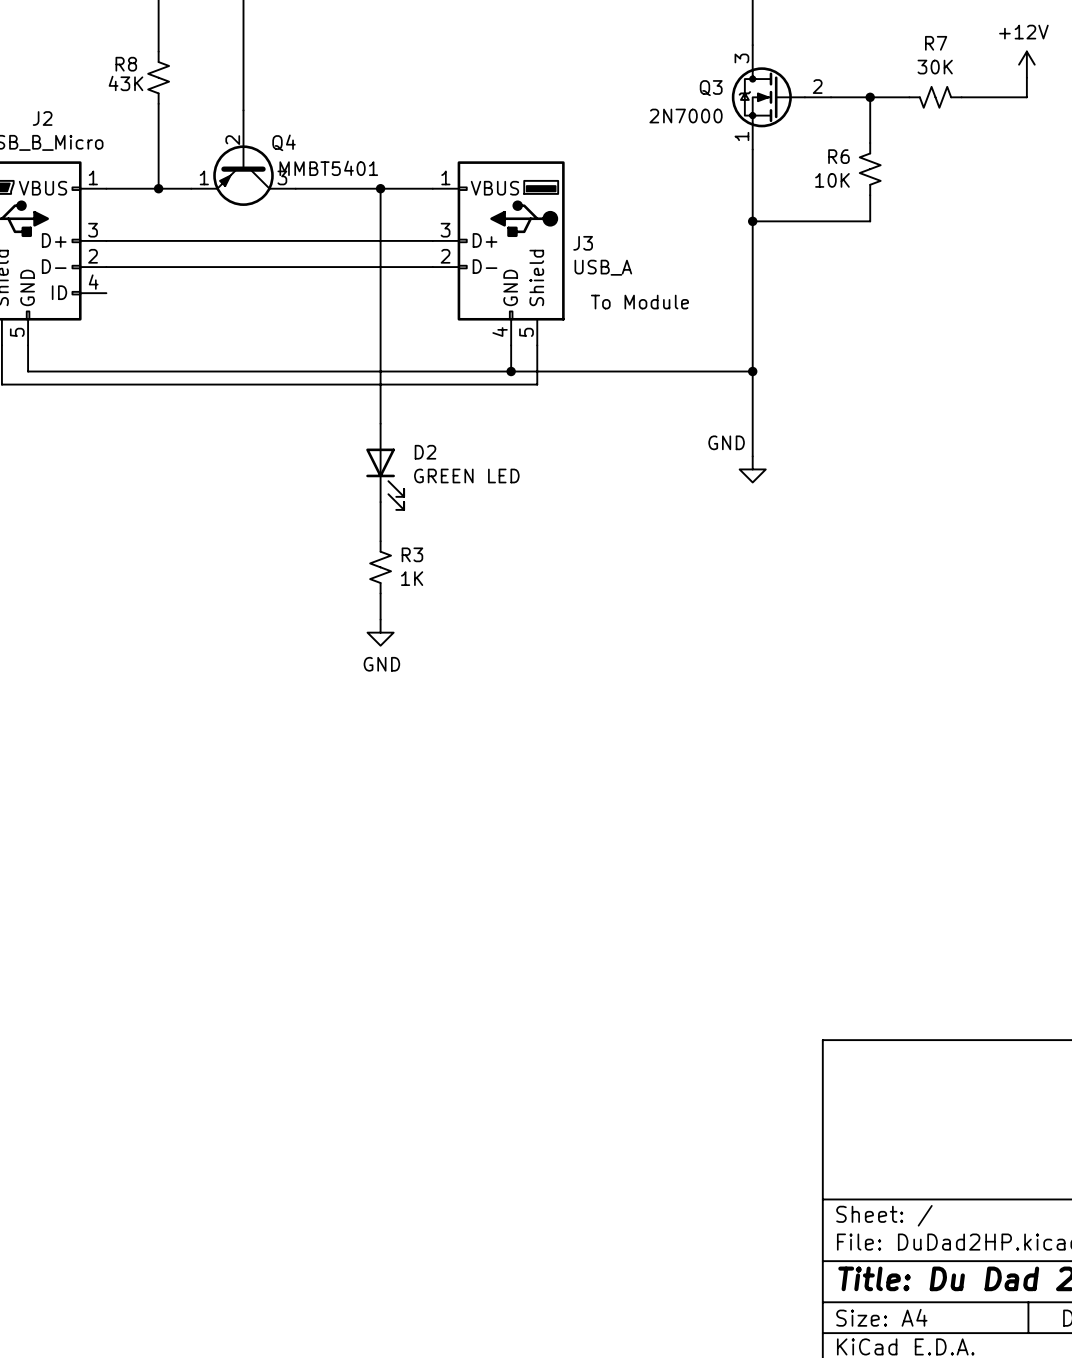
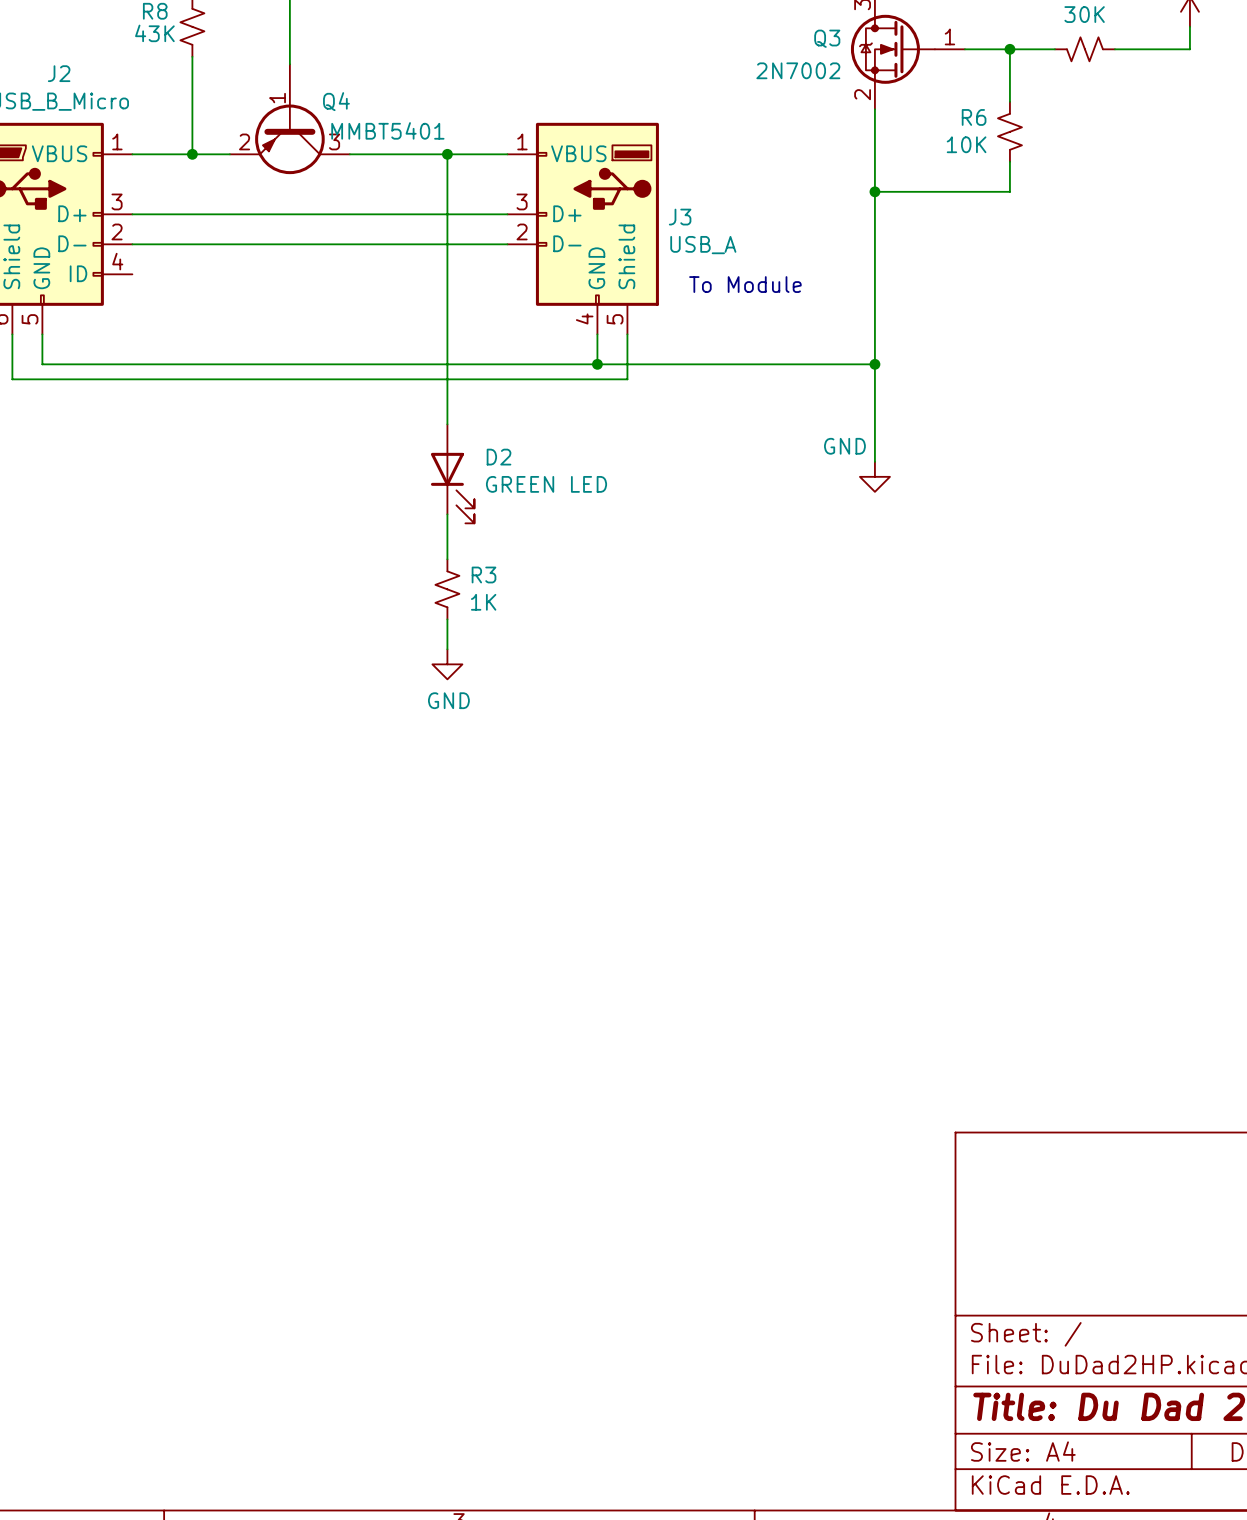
Q3 pin number: 2 (817, 86) -> 1 (949, 36)
Q3 value: 2N7000 (686, 116) -> 2N7002 (798, 70)
Q3 pin number: 1 (741, 136) -> 2 (862, 94)
Q4 pin number: 2 (232, 140) -> 1 (277, 98)
Q4 pin number: 1 (204, 177) -> 2 (244, 141)

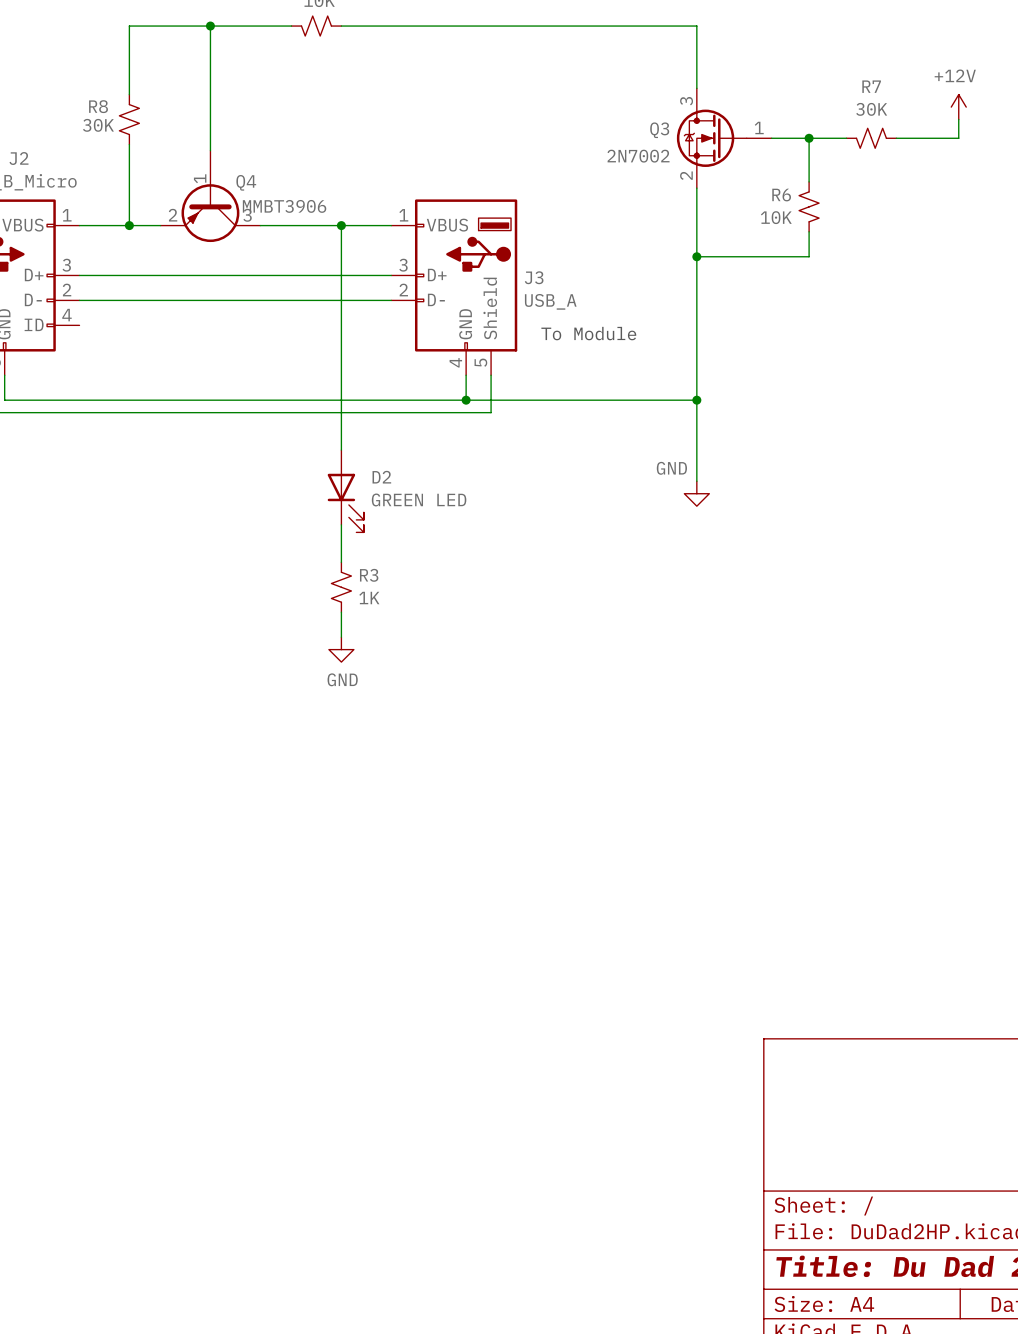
R8 value: 43K (154, 33) -> 30K (98, 125)
Q4 value: MMBT5401 (387, 130) -> MMBT3906 (284, 206)

